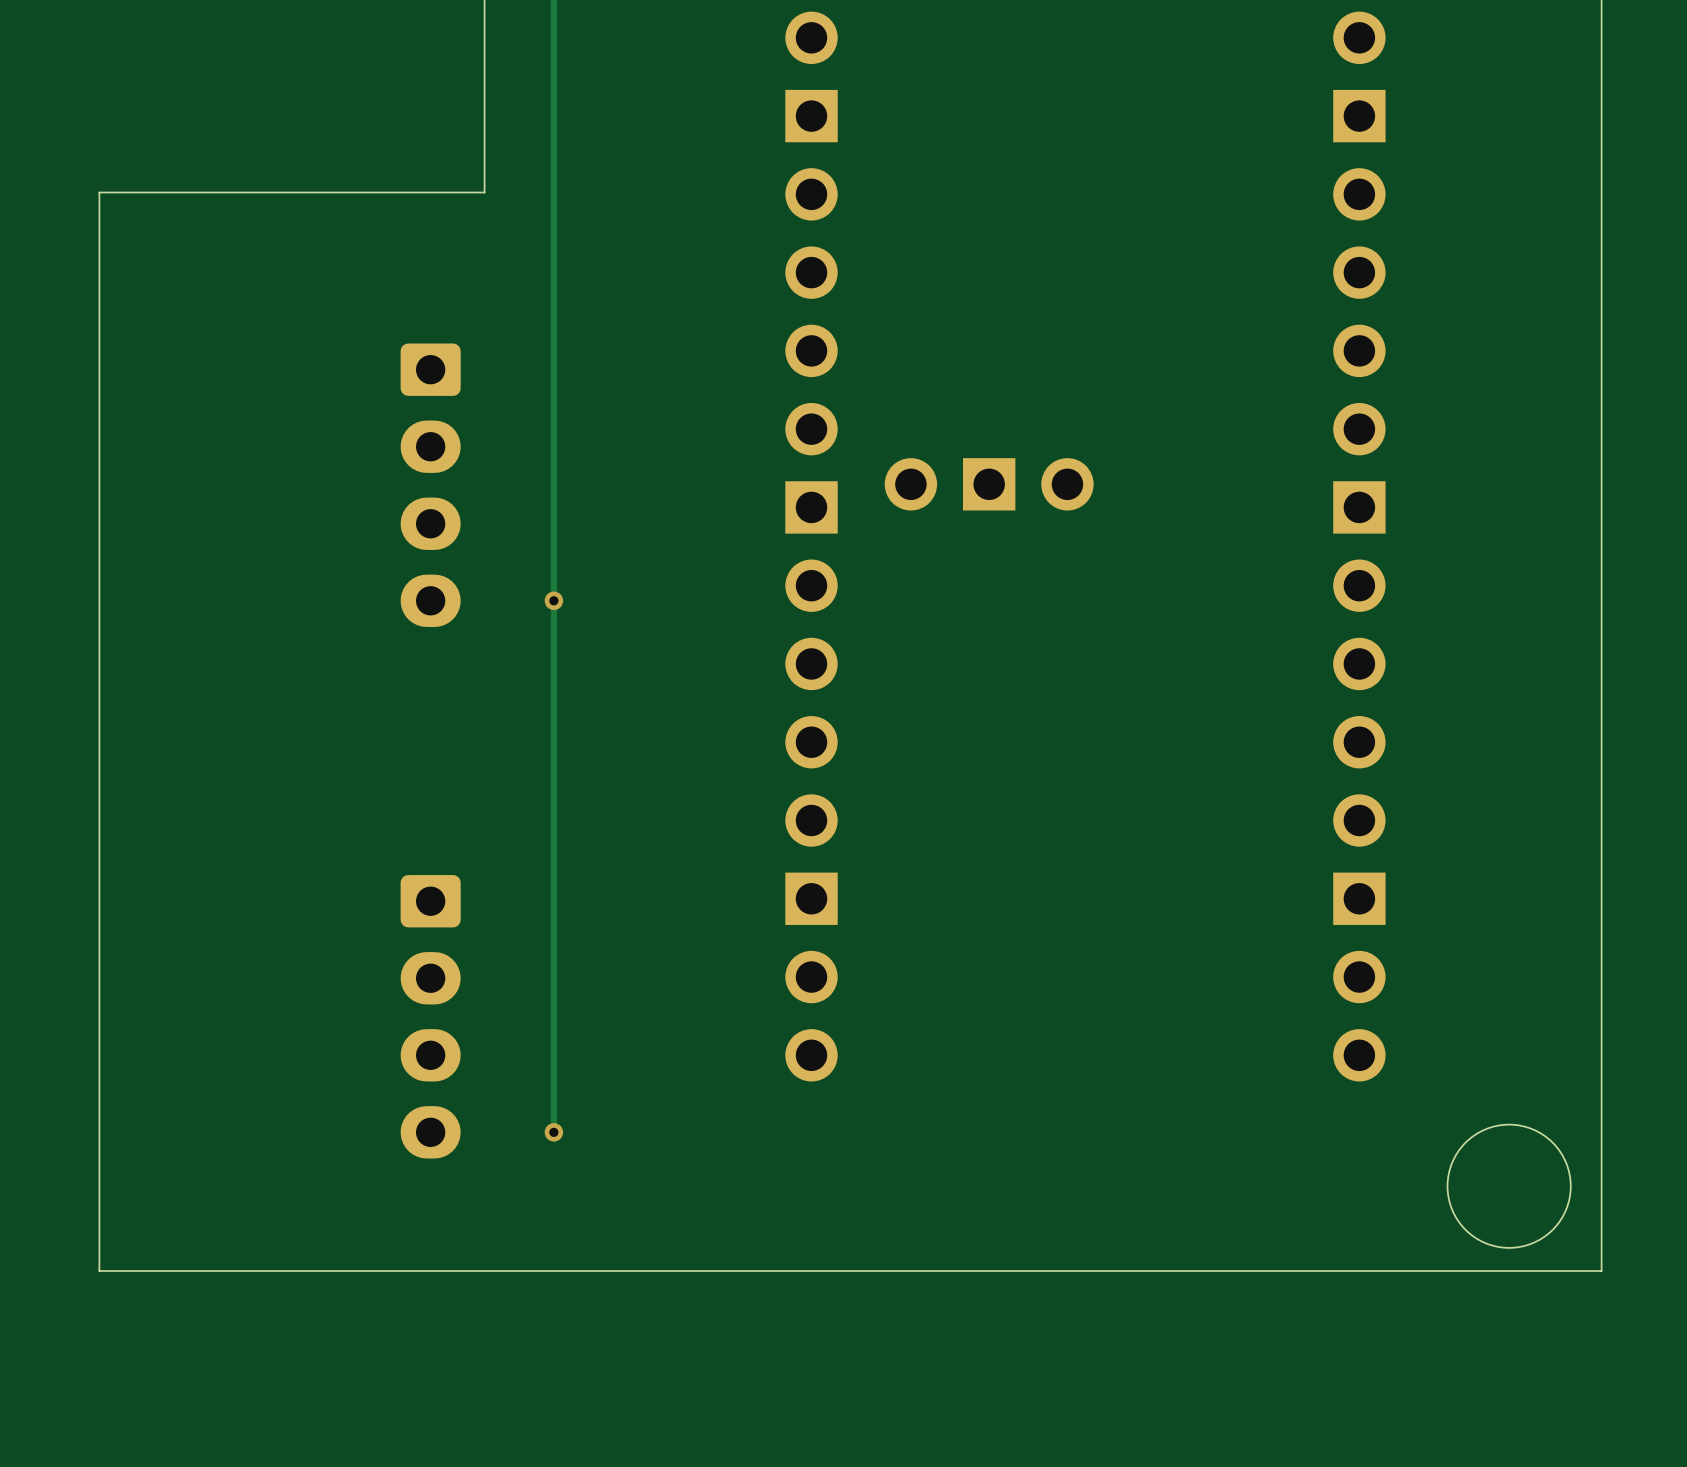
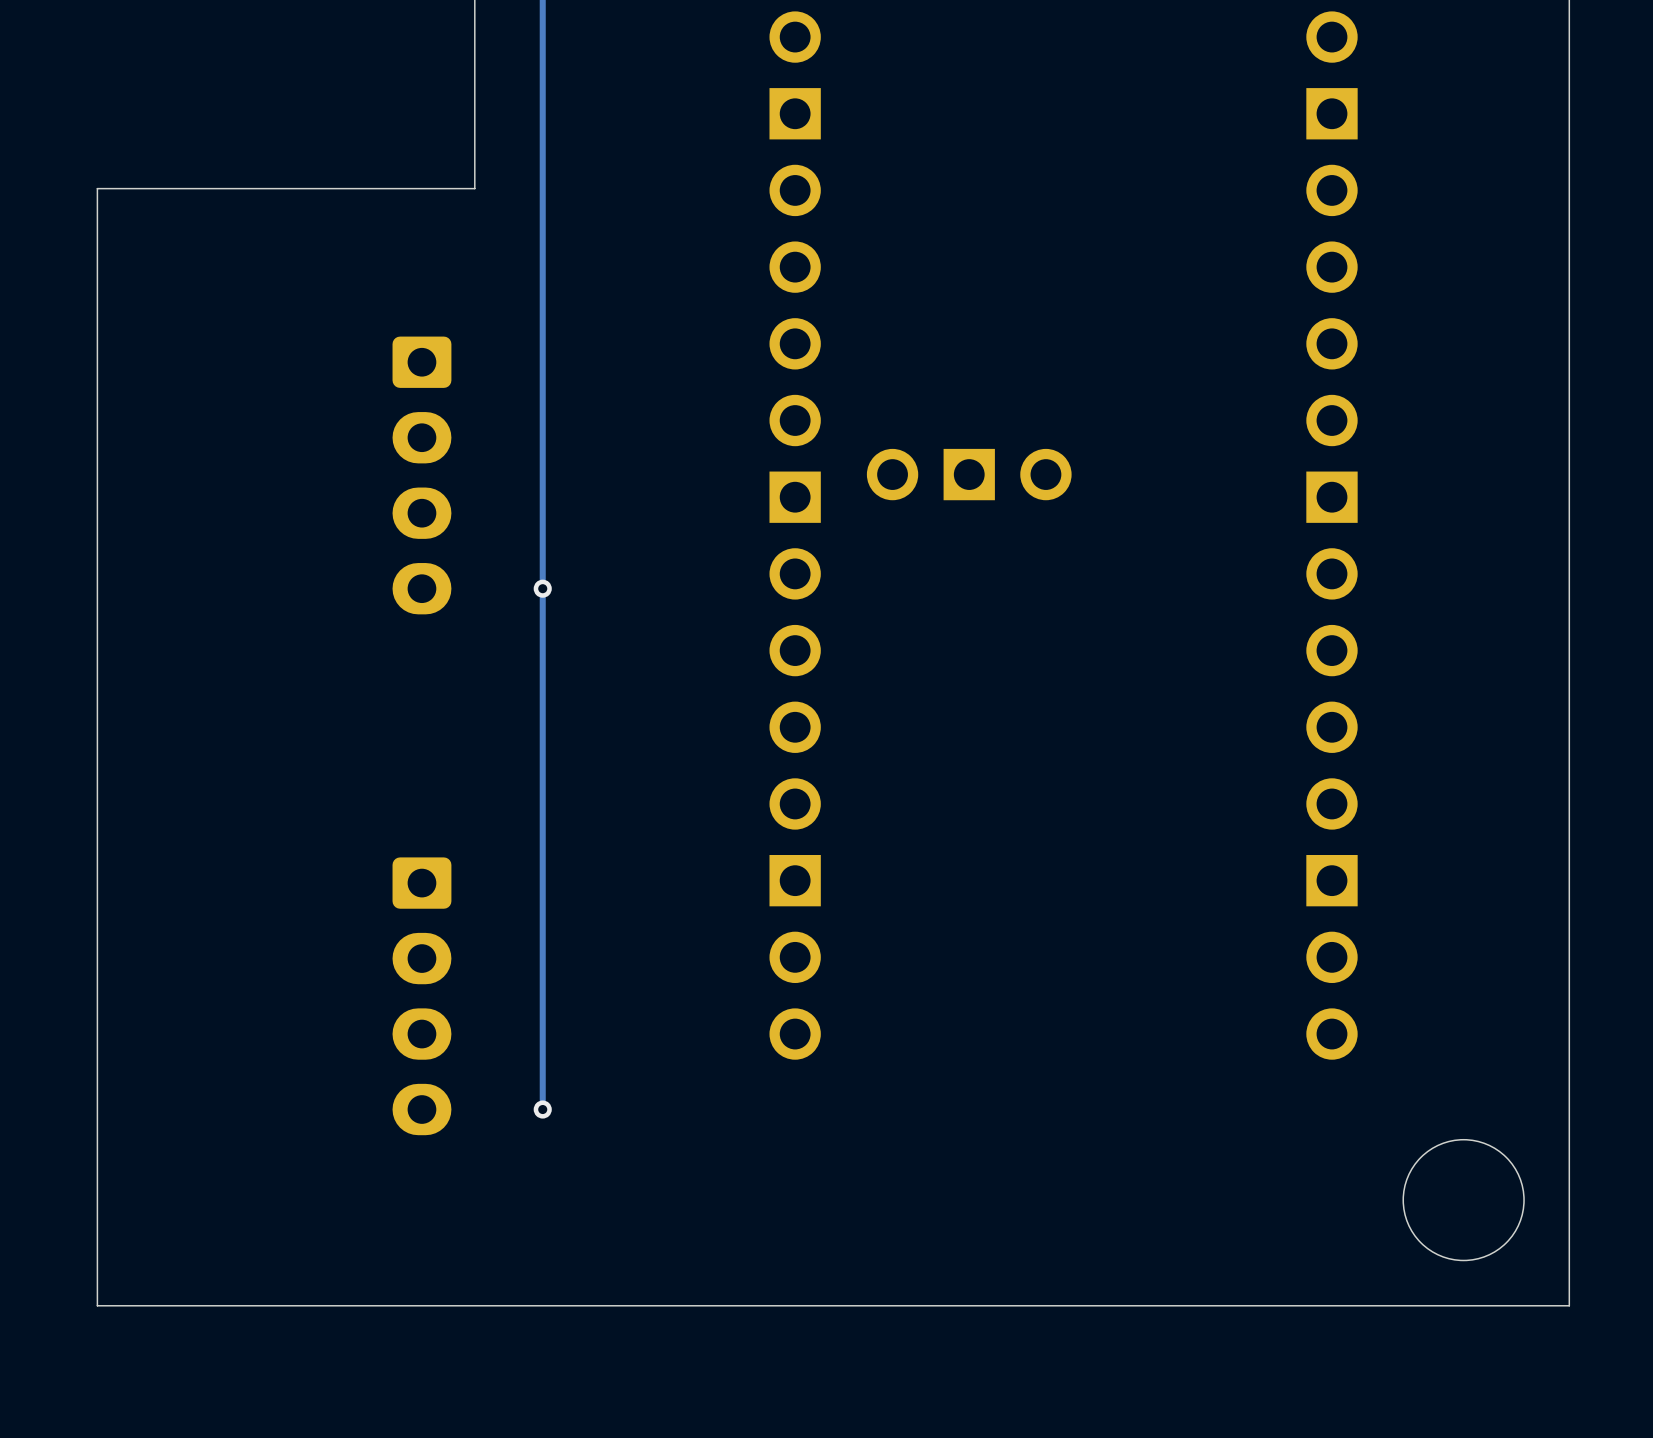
round board edge position: (1509, 1186) -> (1463, 1200)
board edge: (1601, 1271) (99, 1271) -> (1569, 1245) (1569, 1305) (97, 1305) (97, 1245)

